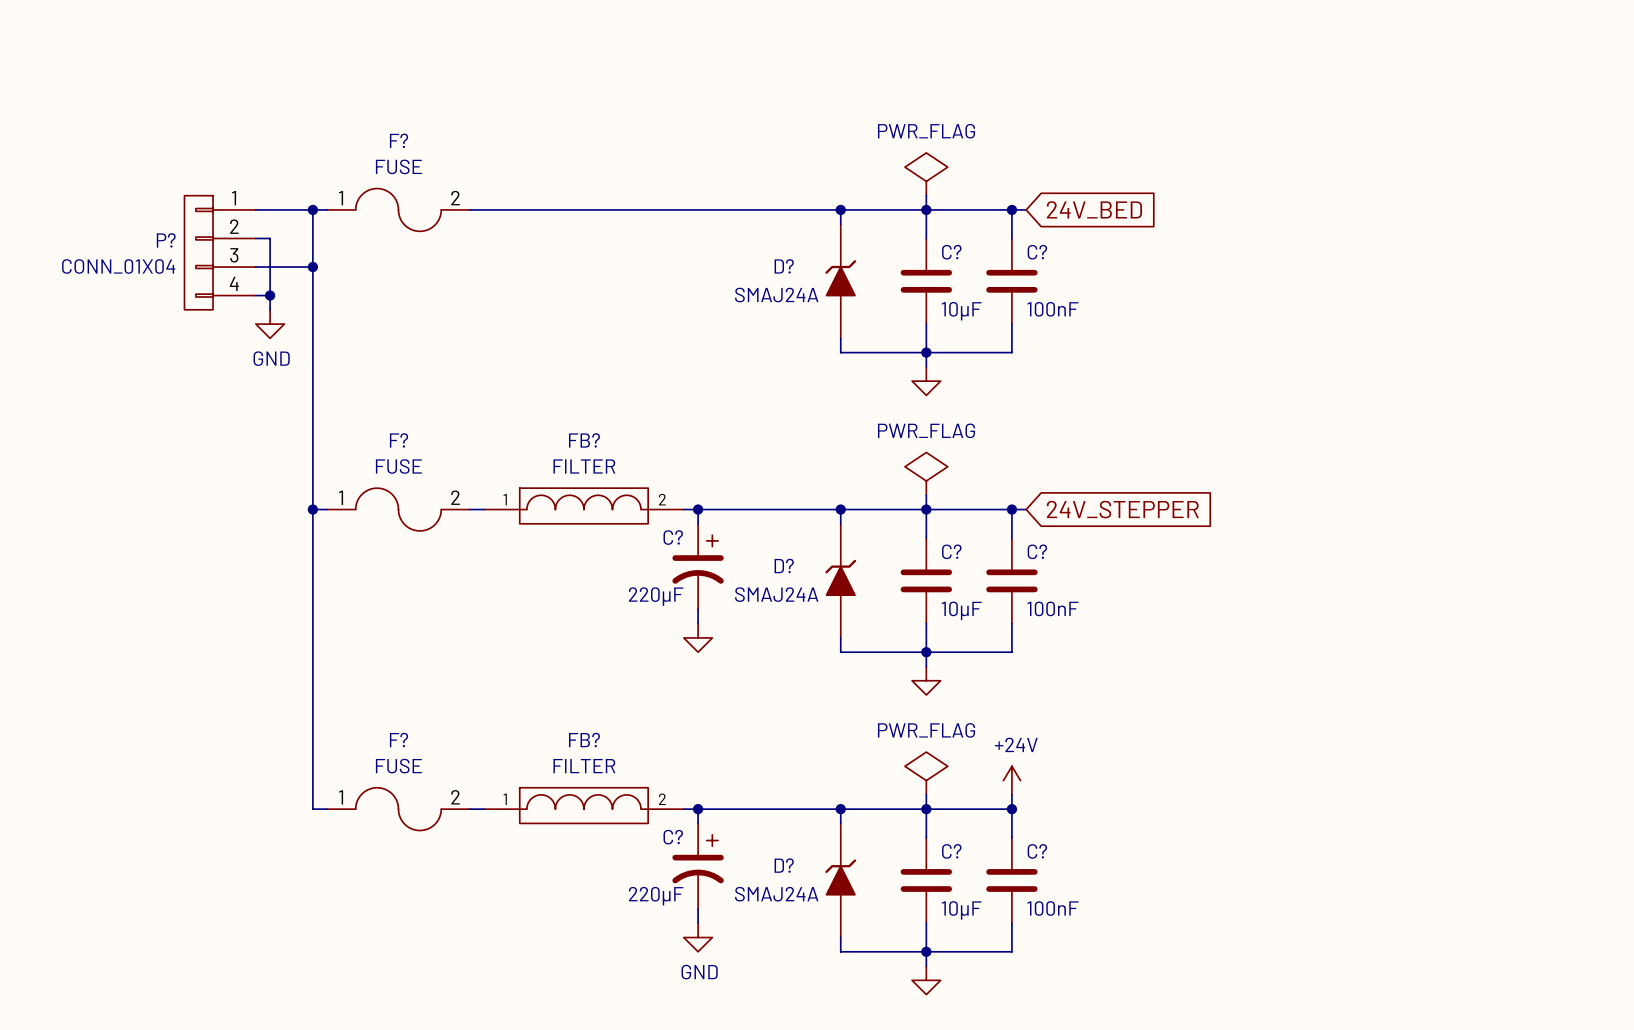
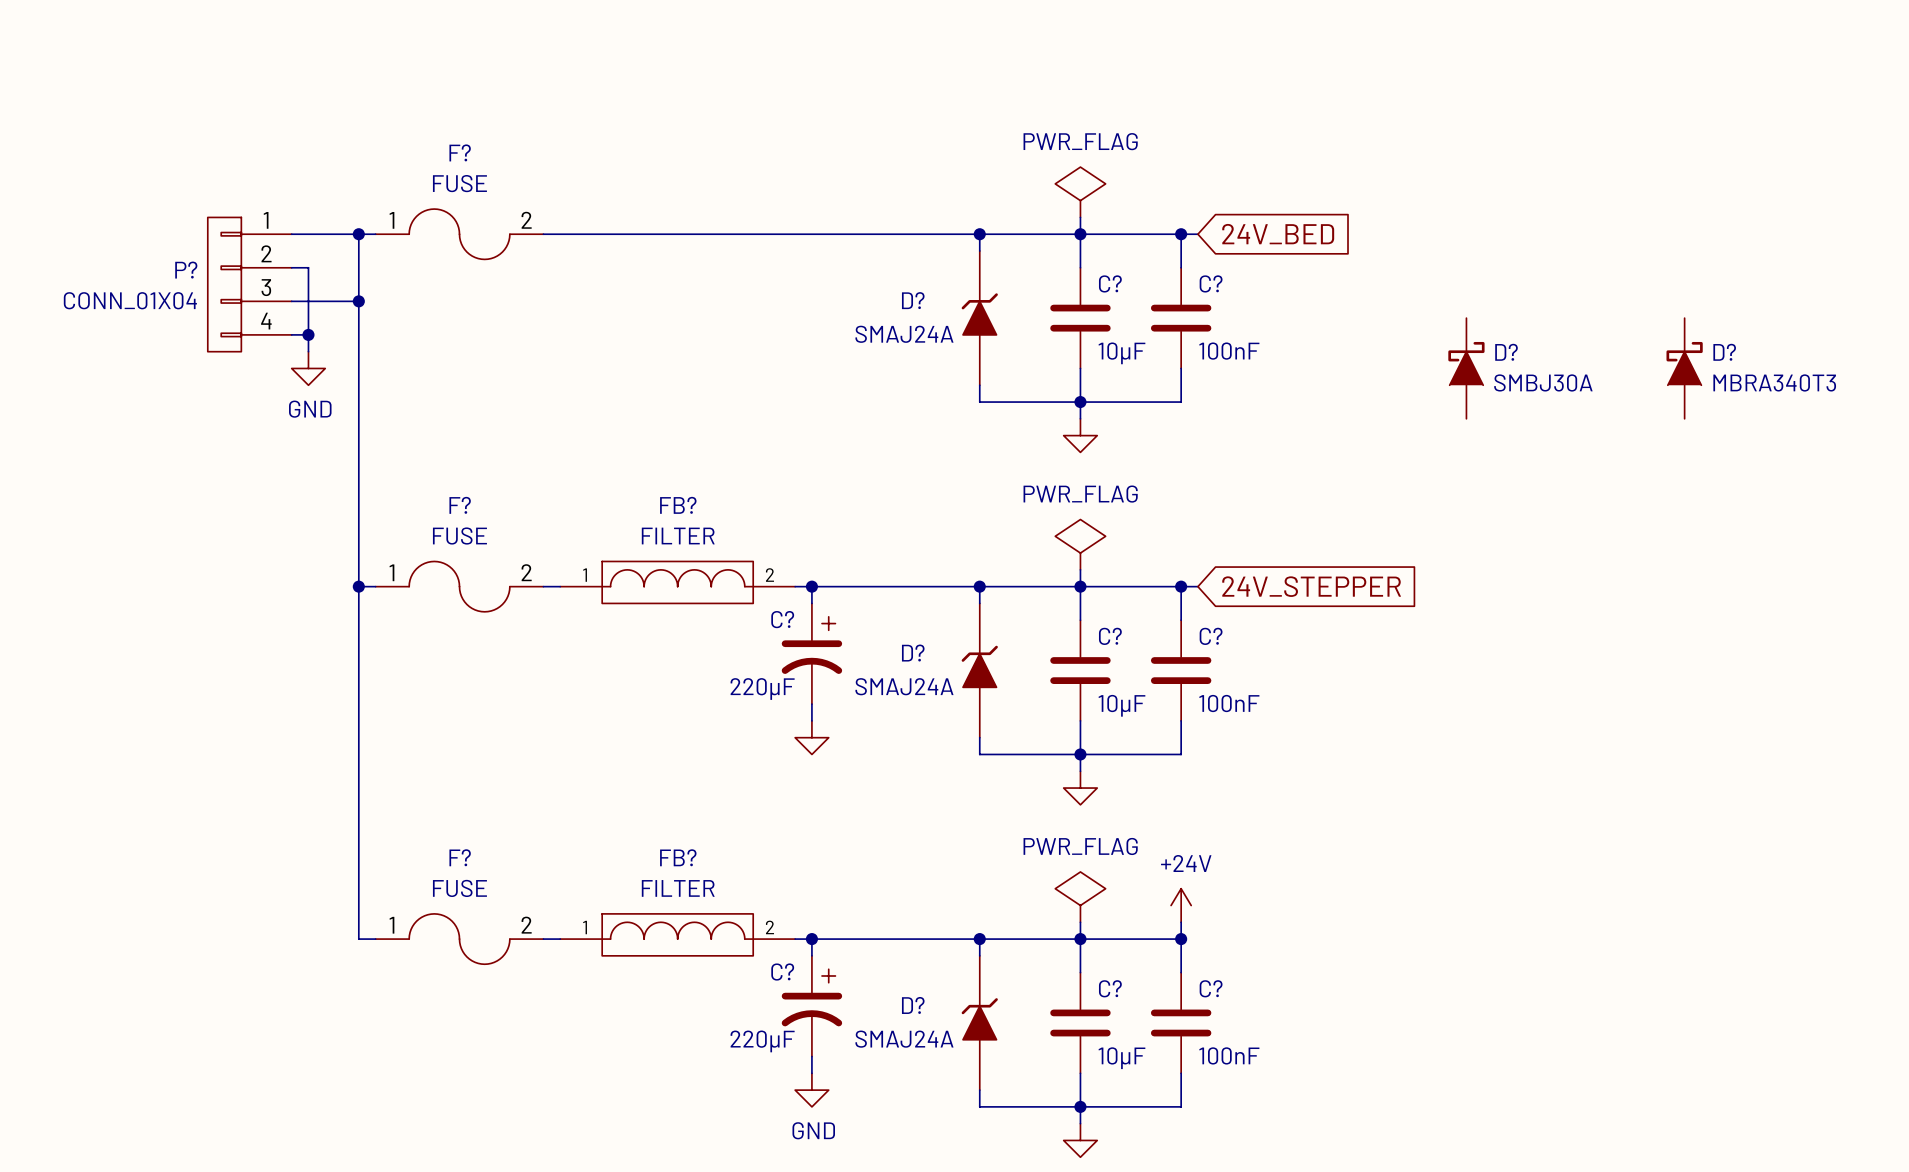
D?: none -> SMBJ30A (1466, 368)
D?: none -> MBRA340T3 (1684, 368)

